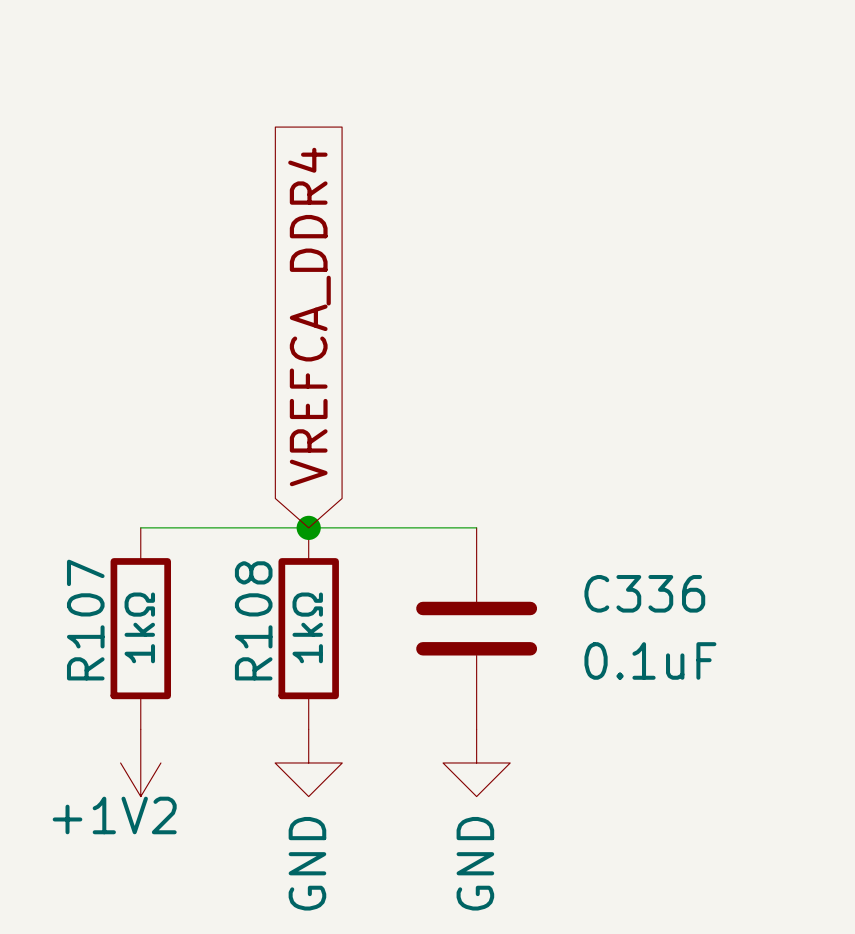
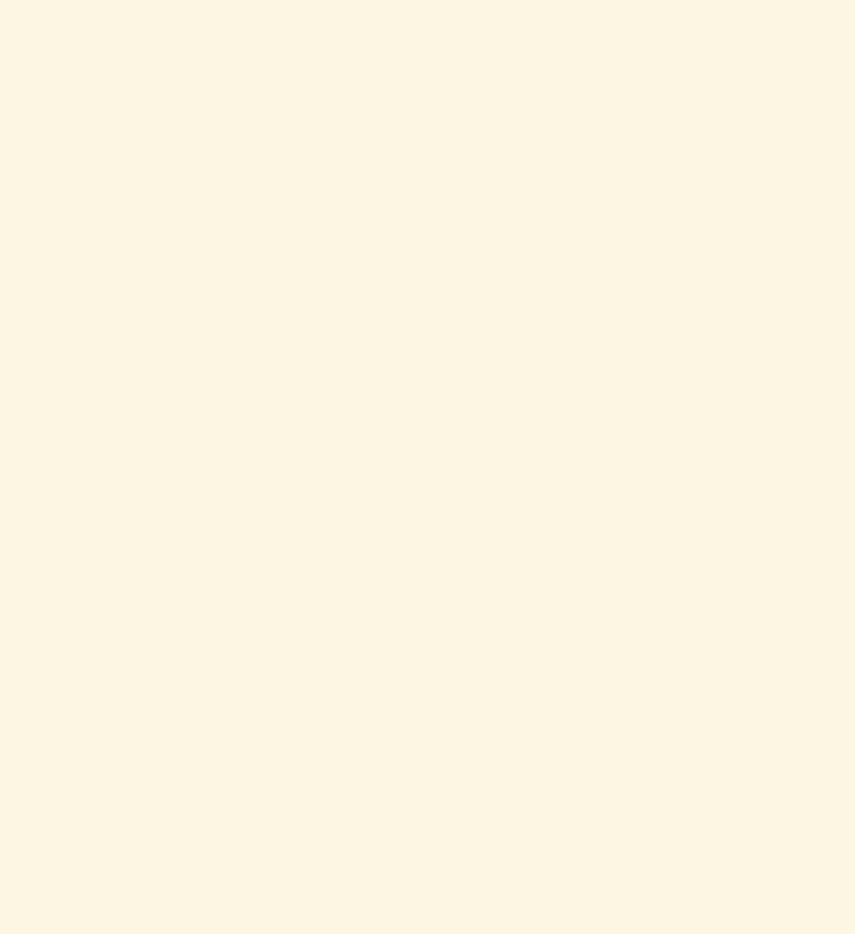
global label: VREFCA_DDR4 (309, 317) -> none
wire: (140, 527) (476, 527) -> none
junction: (308, 527) -> none
R107: 1kΩ (140, 628) -> none
R108: 1kΩ (308, 628) -> none
C336: 0.1uF (476, 628) -> none
power symbol: +1V2 (140, 762) -> none
power symbol: GND (308, 762) -> none
power symbol: GND (476, 762) -> none

